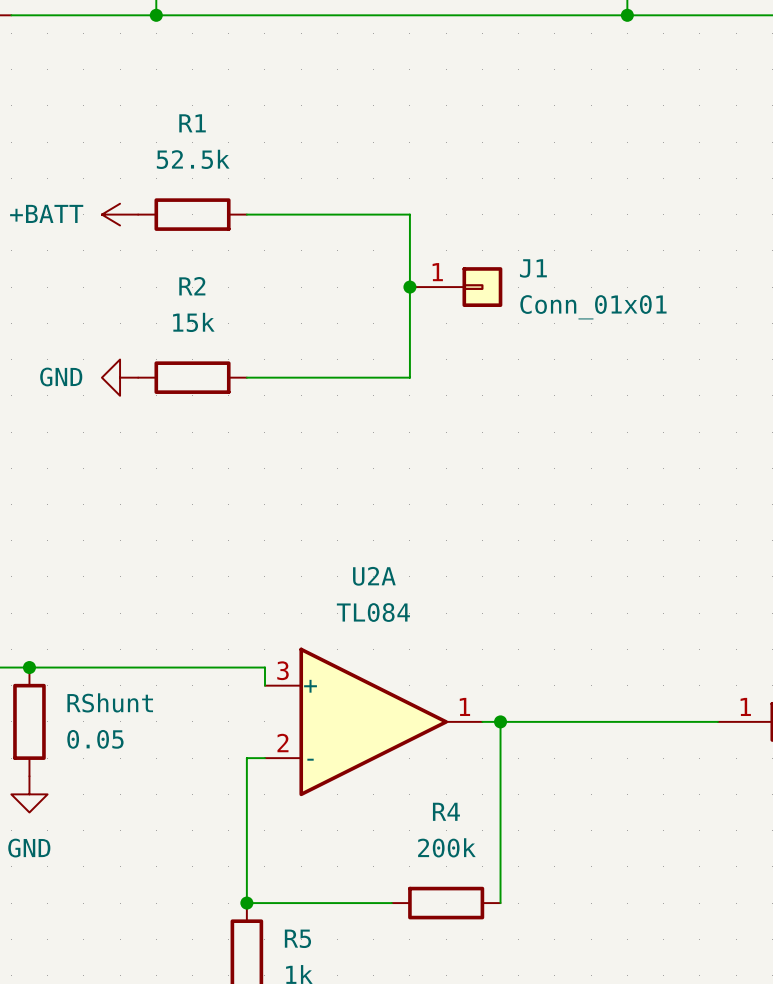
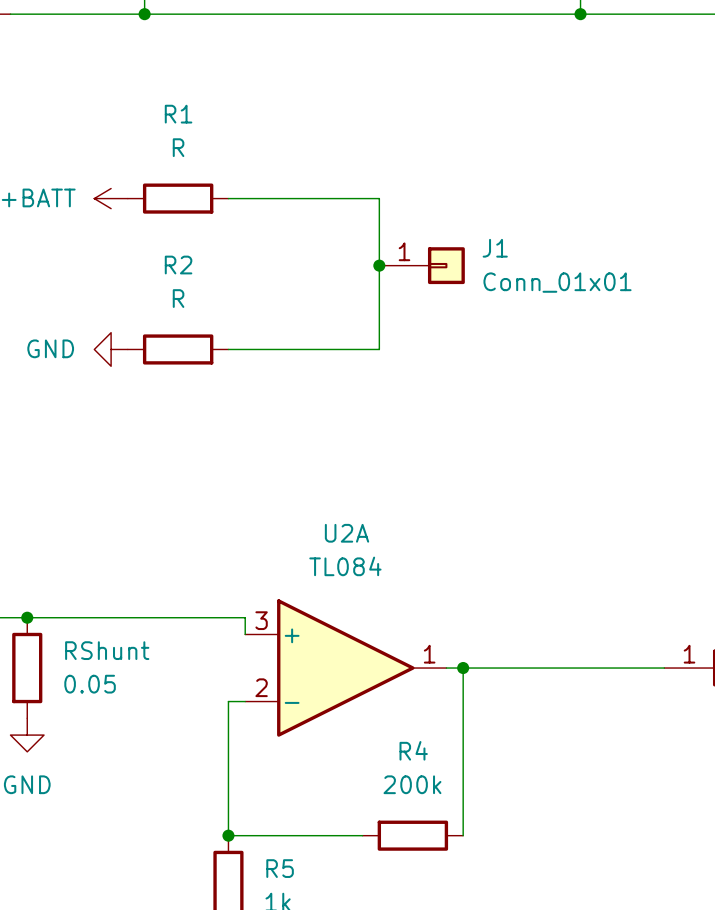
R1 value: 52.5k (193, 159) -> R (178, 147)
R2 value: 15k (193, 322) -> R (178, 298)

